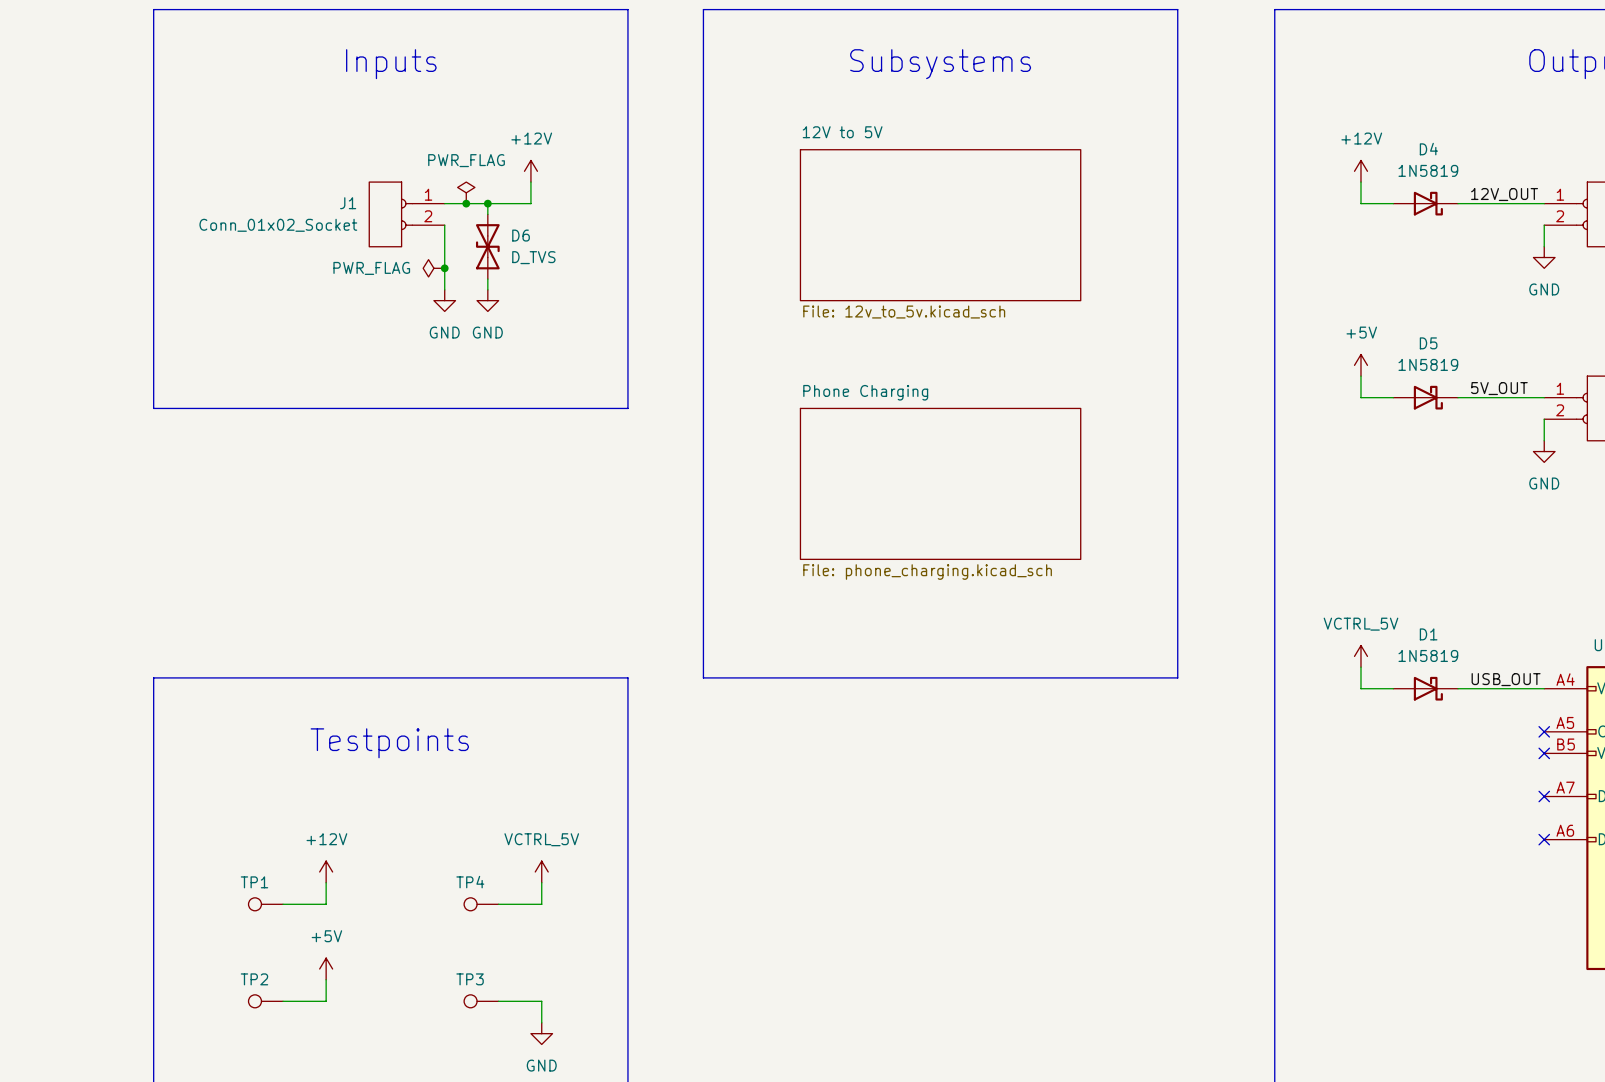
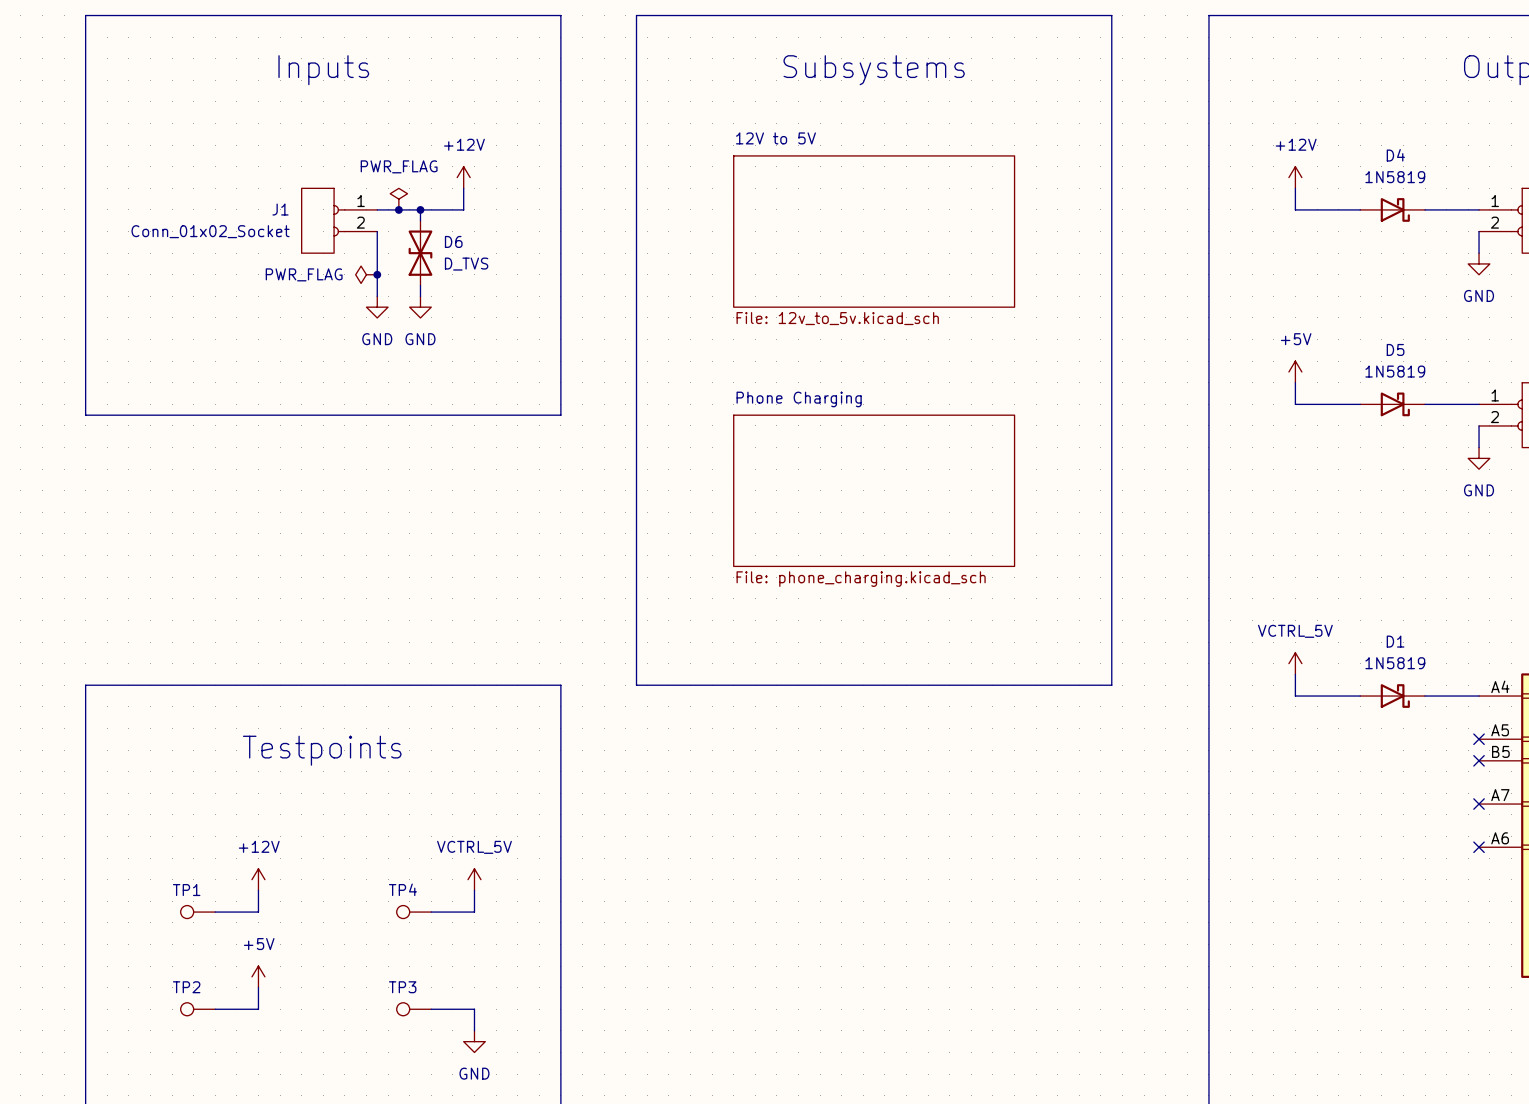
label: 12V_OUT (1504, 194) -> none
D4 position: (1425, 203) -> (1392, 209)
label: 5V_OUT (1499, 388) -> none
D5 position: (1425, 397) -> (1392, 404)
label: USB_OUT (1506, 679) -> none
D1 position: (1425, 688) -> (1392, 696)

